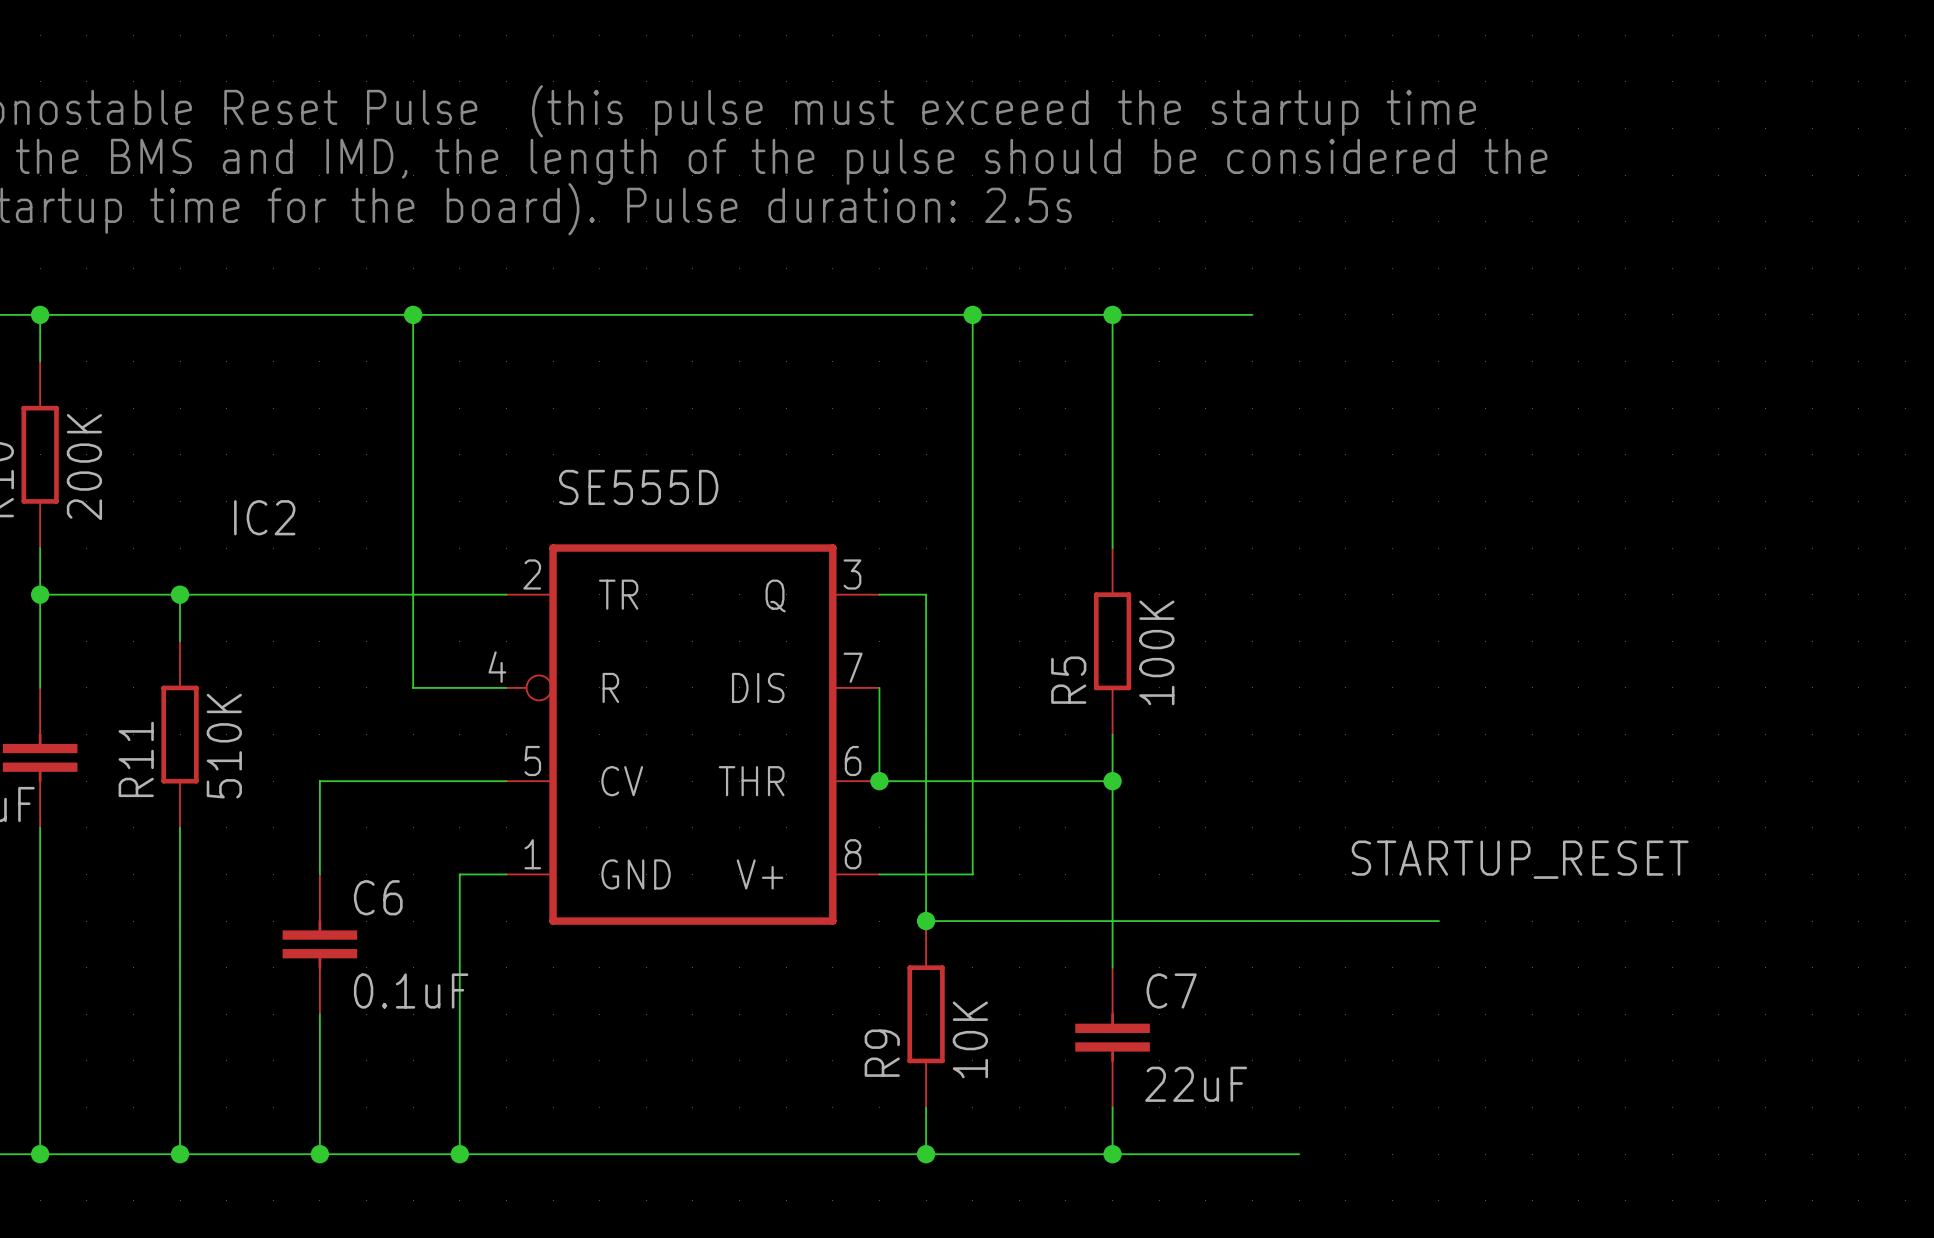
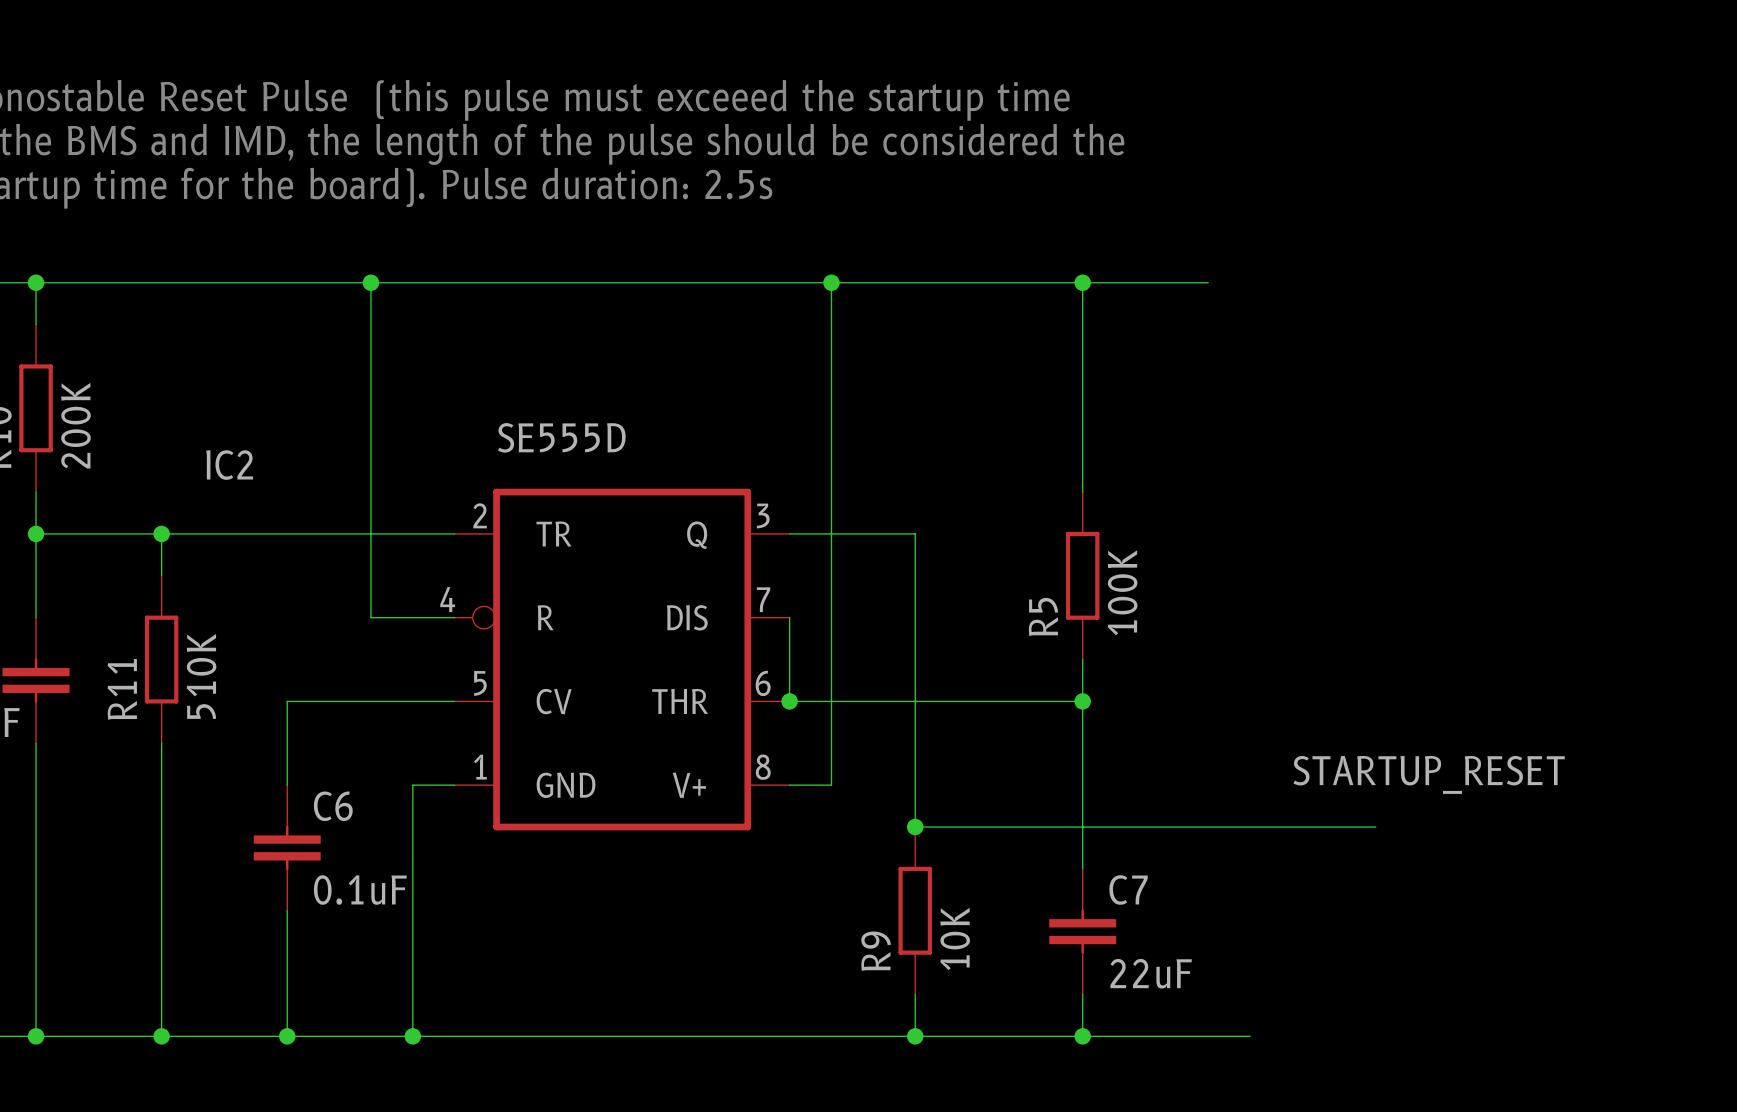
wire: (972, 314) (972, 874) (926, 874) (926, 921) (1019, 921) -> (831, 282) (831, 533) (915, 533) (915, 827)
junction position: (972, 314) -> (831, 282)
wire: (1112, 314) (1112, 548) -> (1082, 282) (1082, 492)
junction: (1112, 314) -> none
junction: none -> (1082, 282)
wire: none -> (1124, 282) (1208, 282)
R5 position: (1112, 641) -> (1082, 575)
wire: (1112, 734) (1112, 967) -> (1082, 659) (1082, 868)
wire: none -> (998, 701) (1082, 701)
junction: (1112, 781) -> none
junction: none -> (1082, 701)
label position: STARTUP_RESET (1520, 859) -> STARTUP_RESET (1429, 774)
junction: (926, 921) -> none
junction: none -> (915, 827)
wire: none -> (1292, 827) (1375, 827)
R9 position: (926, 1014) -> (915, 910)
C7 position: (1112, 1037) -> (1082, 931)
wire: (926, 1107) (926, 1154) -> (915, 994) (915, 1036)
wire: (1112, 1107) (1112, 1154) -> (1082, 994) (1082, 1036)
junction: (926, 1154) -> none
junction: none -> (915, 1036)
junction: (1112, 1154) -> none
junction: none -> (1082, 1036)
wire: none -> (1166, 1036) (1250, 1036)

